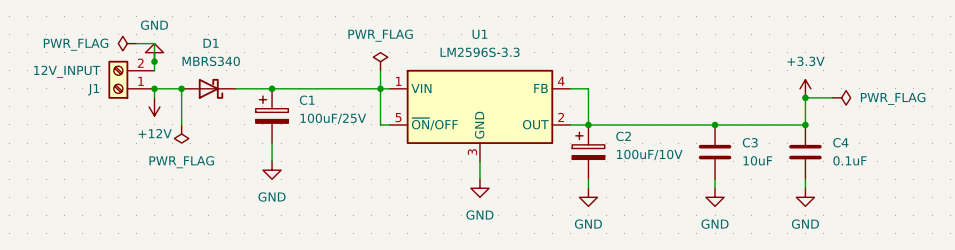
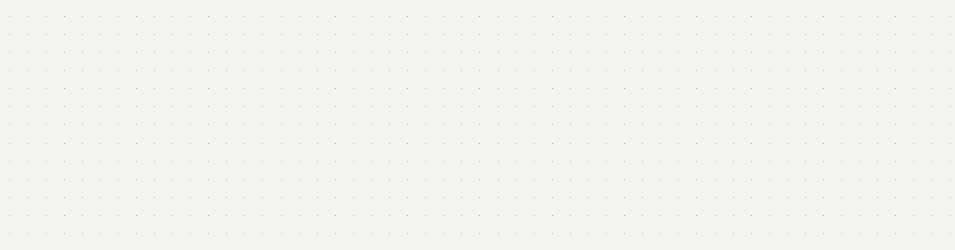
power symbol: PWR_FLAG (127, 43) -> none
wire: (136, 43) (154, 43) (154, 70) -> none
power symbol: GND (154, 52) -> none
junction: (154, 61) -> none
power symbol: PWR_FLAG (380, 61) -> none
wire: (380, 70) (380, 124) (389, 124) -> none
J1: 12V_INPUT (131, 79) -> none
junction: (154, 88) -> none
junction: (181, 88) -> none
D1: MBRS340 (208, 88) -> none
wire: (235, 88) (389, 88) -> none
junction: (272, 88) -> none
junction: (380, 88) -> none
wire: (570, 88) (588, 88) (588, 124) -> none
power symbol: +3.3V (805, 88) -> none
wire: (154, 97) (154, 88) (181, 88) (181, 124) -> none
junction: (805, 97) -> none
wire: (832, 97) (805, 97) (805, 124) (570, 124) -> none
power symbol: PWR_FLAG (841, 97) -> none
power symbol: +12V (154, 106) -> none
C1: 100uF/25V (272, 115) -> none
U1: LM2596S-3.3 (479, 115) -> none
junction: (588, 124) -> none
junction: (715, 124) -> none
junction: (805, 124) -> none
power symbol: PWR_FLAG (181, 134) -> none
wire: (272, 143) (272, 161) -> none
C2: 100uF/10V (588, 152) -> none
C3: 10uF (715, 152) -> none
C4: 0.1uF (805, 152) -> none
wire: (479, 161) (479, 179) -> none
power symbol: GND (272, 170) -> none
wire: (588, 179) (588, 188) -> none
wire: (715, 179) (715, 188) -> none
wire: (805, 179) (805, 188) -> none
power symbol: GND (479, 188) -> none
power symbol: GND (588, 197) -> none
power symbol: GND (715, 197) -> none
power symbol: GND (805, 197) -> none

